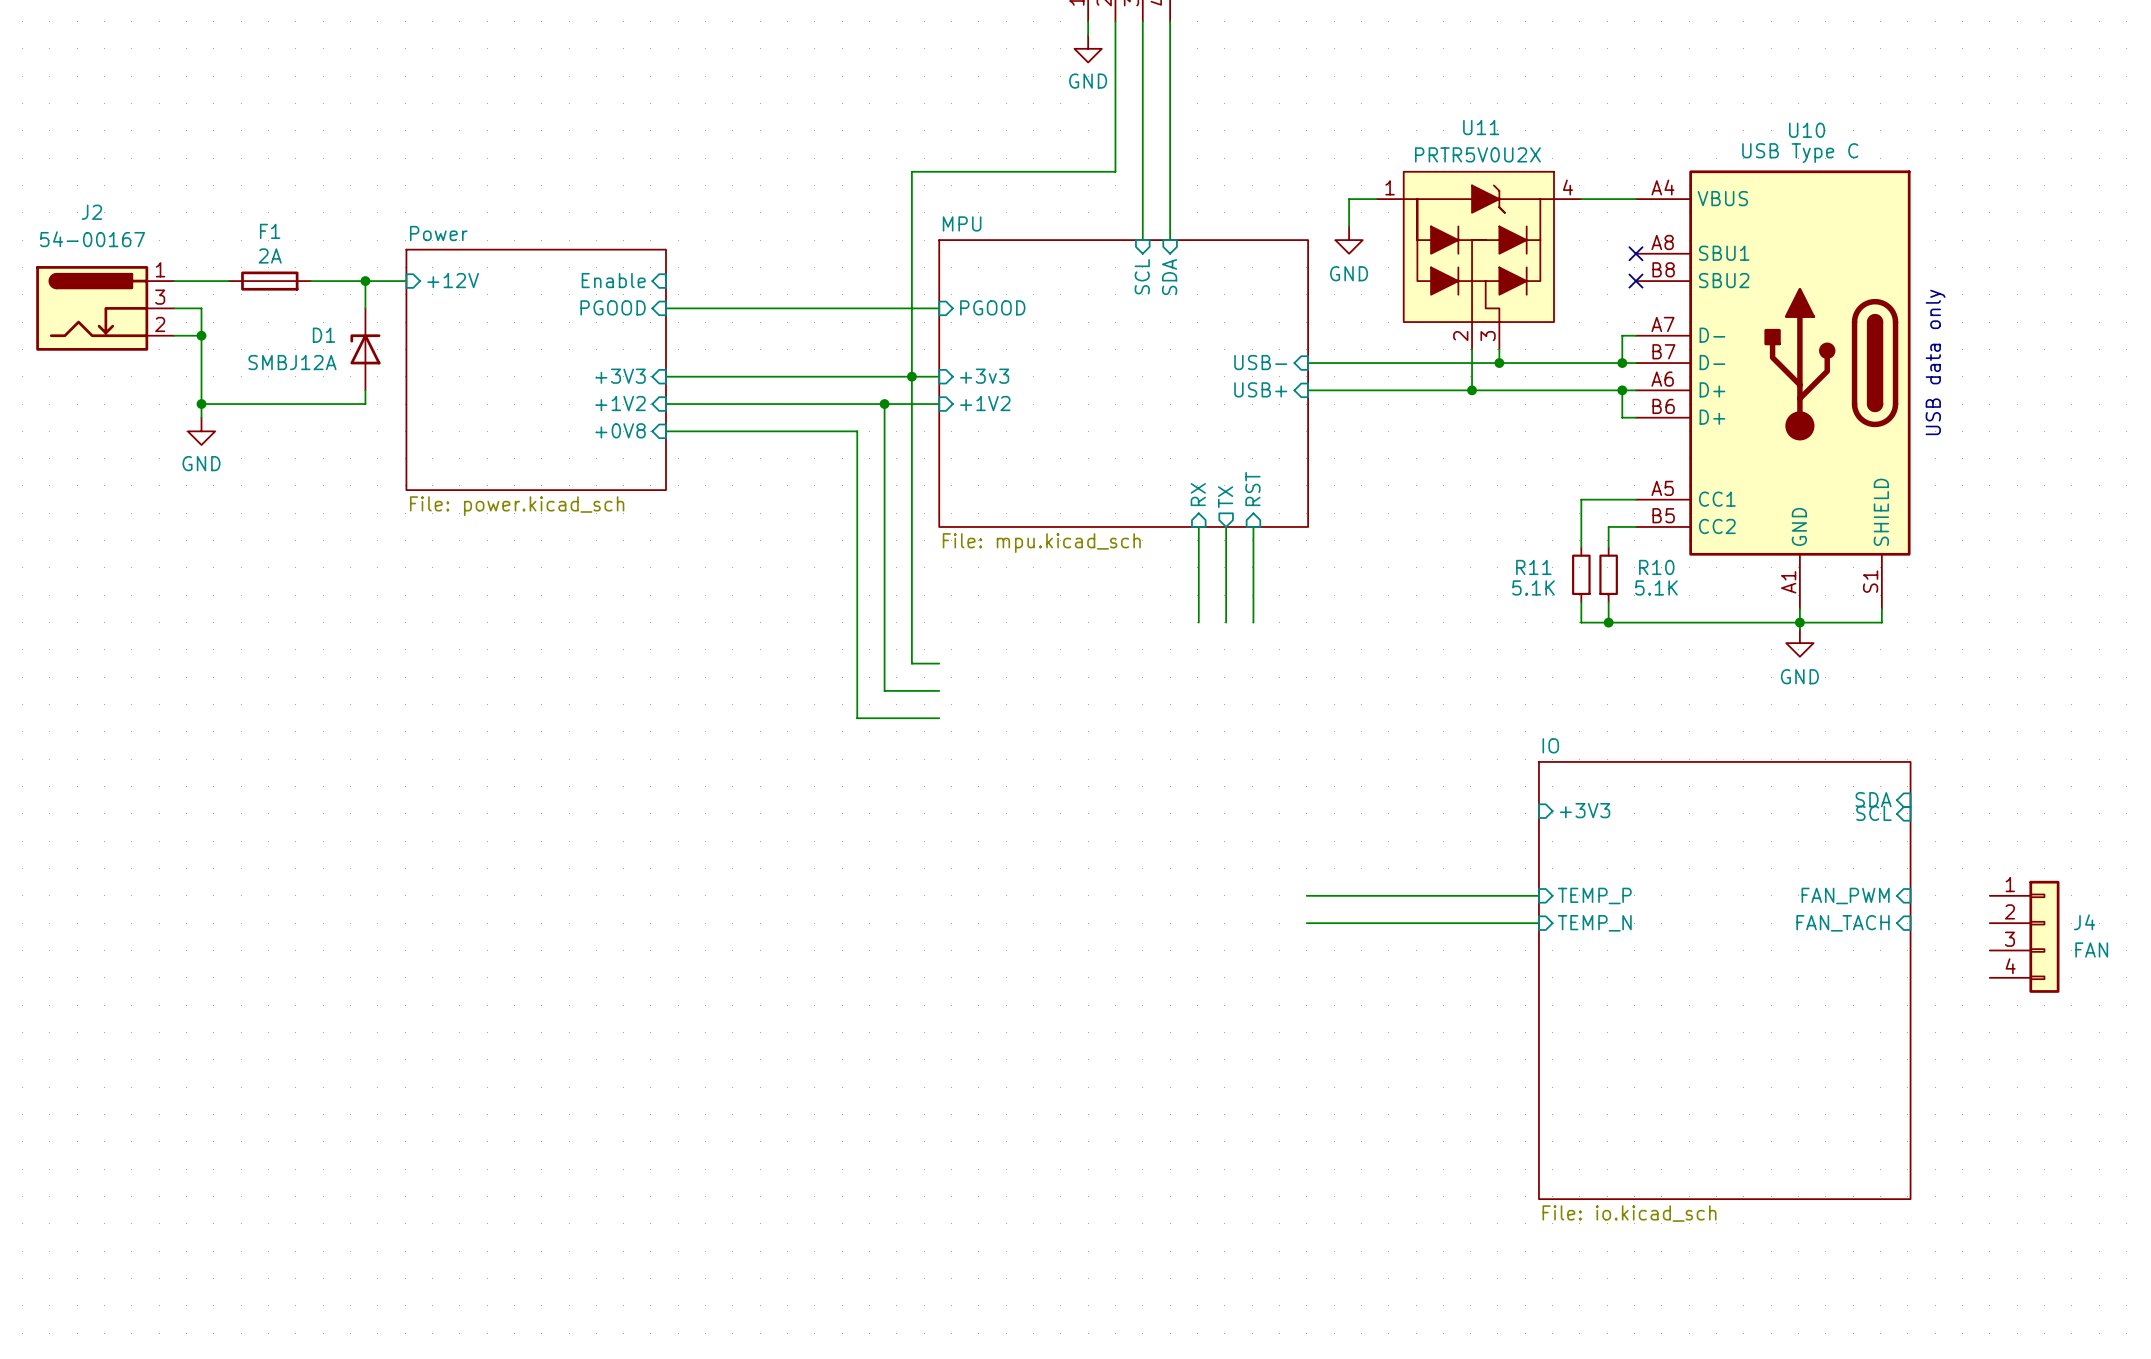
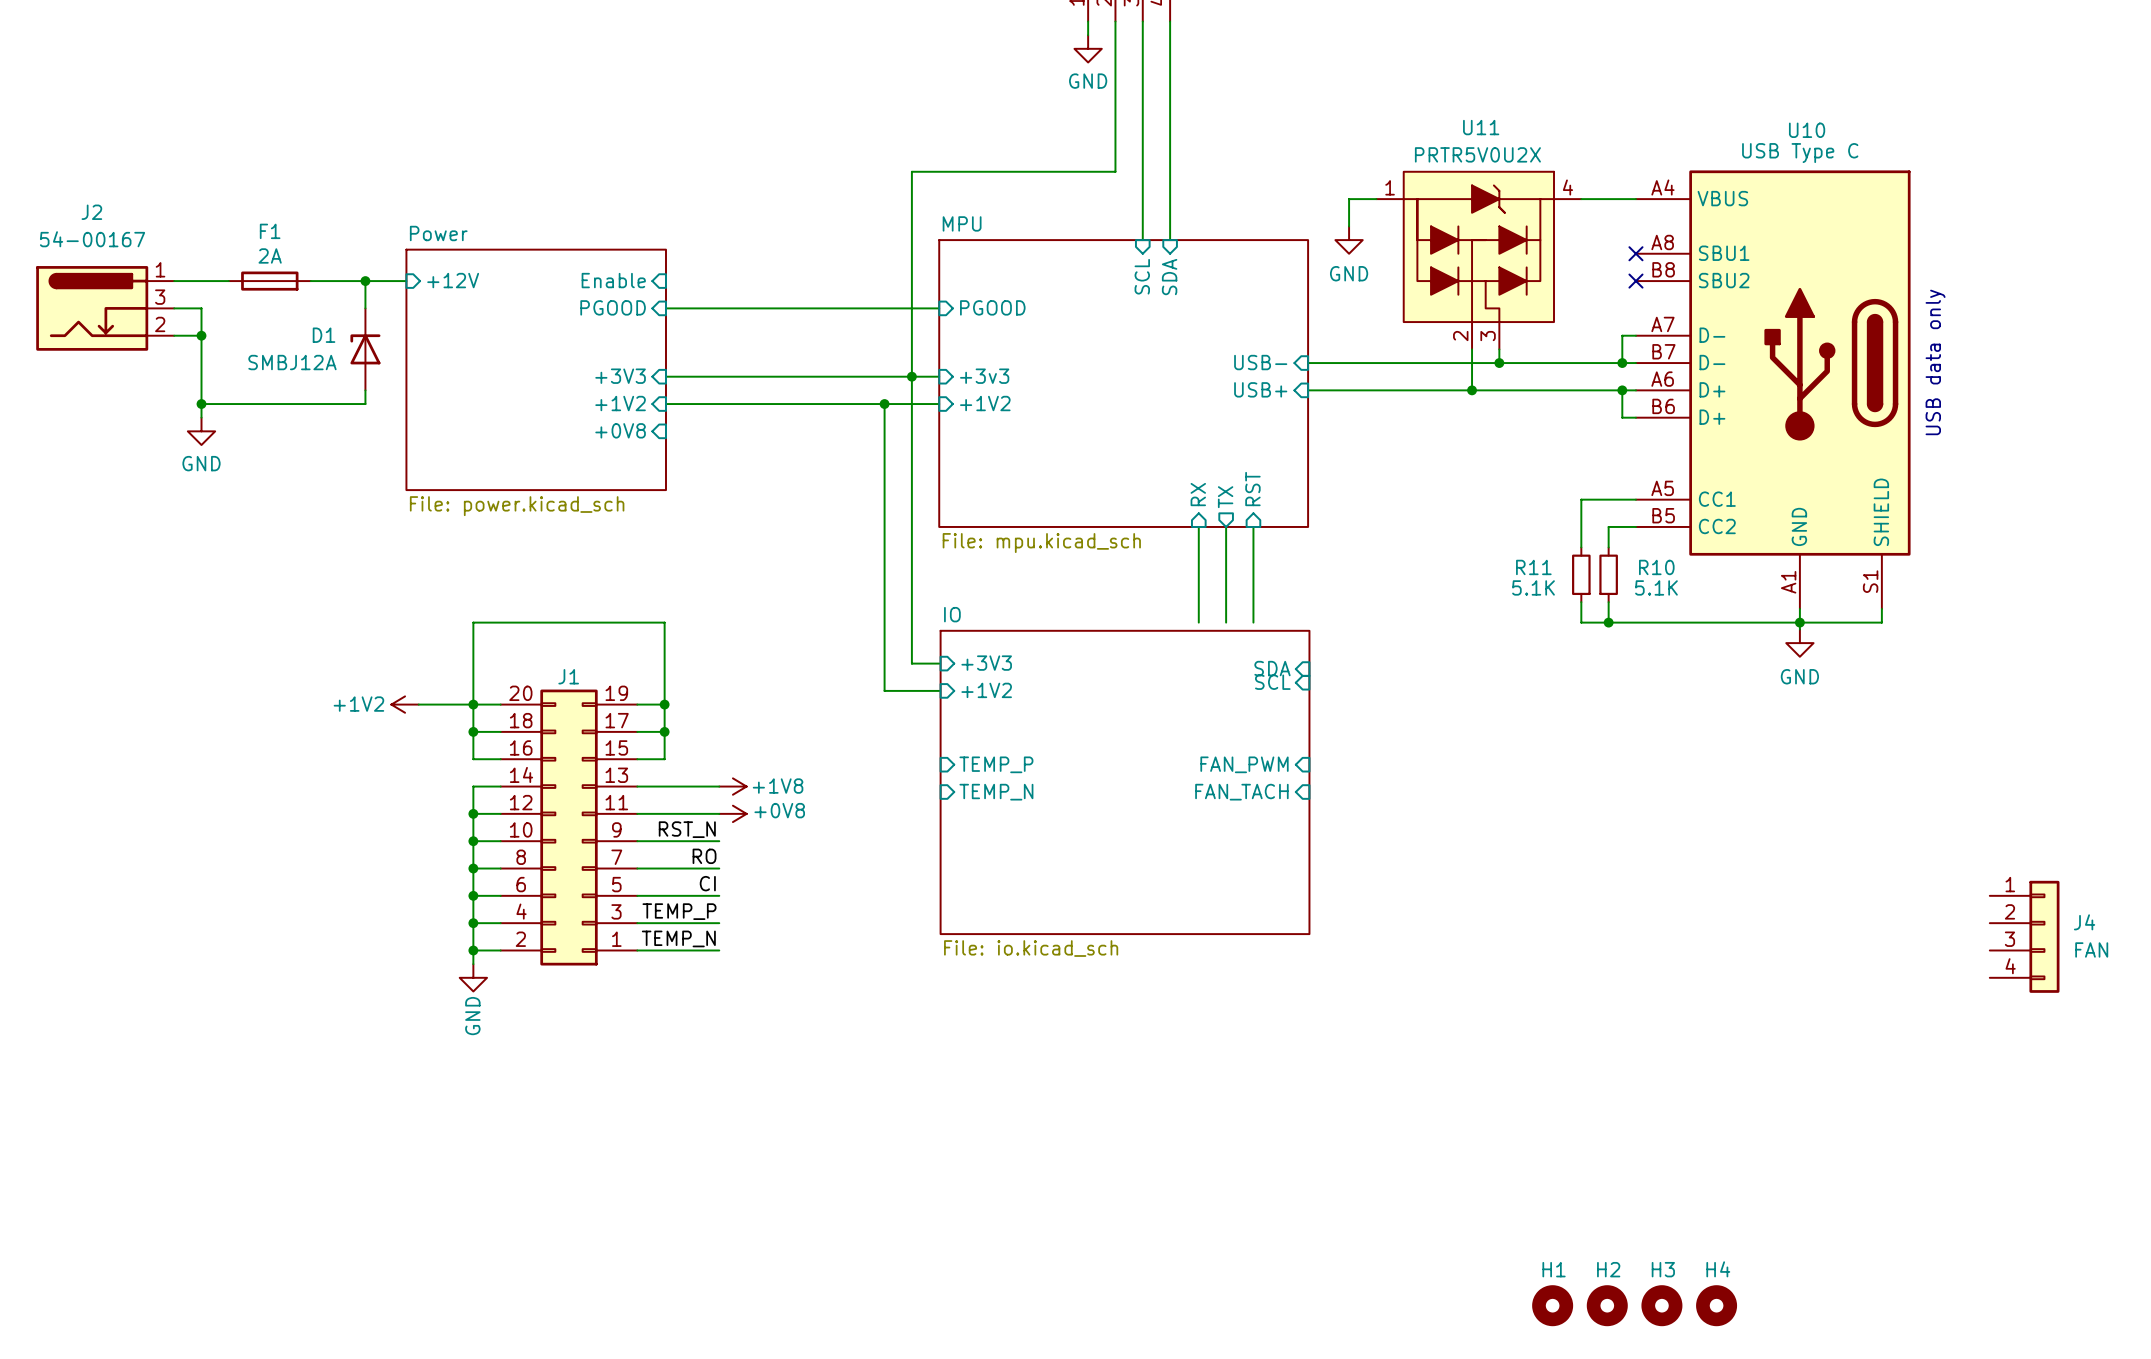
wire: (665, 431) (857, 431) (857, 718) (939, 718) -> none
sheet pin: none -> +3V3 (986, 663)
sheet pin: none -> SDA (1272, 668)
sheet pin: none -> SCL (1272, 682)
sheet pin: none -> +1V2 (986, 690)
power symbol: none -> +1V2 (405, 704)
wire: none -> (418, 704) (500, 704)
junction: none -> (473, 704)
wire: none -> (637, 704) (664, 704)
junction: none -> (664, 704)
wire: none -> (473, 731) (500, 731)
junction: none -> (473, 731)
wire: none -> (637, 731) (664, 731)
junction: none -> (664, 731)
wire: none -> (500, 759) (473, 759) (473, 622) (664, 622) (664, 759) (637, 759)
sheet pin: none -> TEMP_P (996, 764)
sheet pin: none -> FAN_PWM (1244, 764)
sheet IO: none -> File: io.kicad_sch (1125, 782)
wire: none -> (500, 786) (473, 786) (473, 964)
wire: none -> (637, 786) (719, 786)
power symbol: none -> +1V8 (732, 786)
sheet pin: none -> TEMP_N (996, 792)
sheet pin: none -> FAN_TACH (1241, 792)
sheet pin: SDA (1873, 799) -> none
sheet pin: +3V3 (1585, 810) -> none
wire: none -> (473, 813) (500, 813)
junction: none -> (473, 813)
wire: none -> (637, 813) (719, 813)
power symbol: none -> +0V8 (732, 813)
sheet pin: SCL (1873, 813) -> none
J1: none -> (569, 827)
label: none -> RST_N (687, 829)
wire: none -> (473, 841) (500, 841)
junction: none -> (473, 841)
wire: none -> (637, 841) (719, 841)
label: none -> RO (704, 856)
wire: none -> (473, 868) (500, 868)
junction: none -> (473, 868)
wire: none -> (637, 868) (719, 868)
label: none -> CI (707, 883)
wire: none -> (473, 895) (500, 895)
junction: none -> (473, 895)
wire: none -> (637, 895) (719, 895)
wire: (1306, 895) (1538, 895) -> none
sheet pin: TEMP_P (1594, 895) -> none
sheet pin: FAN_PWM (1845, 895) -> none
label: none -> TEMP_P (679, 911)
wire: none -> (473, 923) (500, 923)
junction: none -> (473, 923)
wire: none -> (637, 923) (719, 923)
wire: (1306, 923) (1538, 923) -> none
sheet pin: TEMP_N (1594, 923) -> none
sheet pin: FAN_TACH (1843, 923) -> none
label: none -> TEMP_N (678, 938)
wire: none -> (473, 950) (500, 950)
junction: none -> (473, 950)
wire: none -> (637, 950) (719, 950)
power symbol: none -> GND (473, 977)
sheet IO: File: io.kicad_sch (1724, 980) -> none
H1: none -> (1552, 1305)
H2: none -> (1607, 1305)
H3: none -> (1661, 1305)
H4: none -> (1716, 1305)

